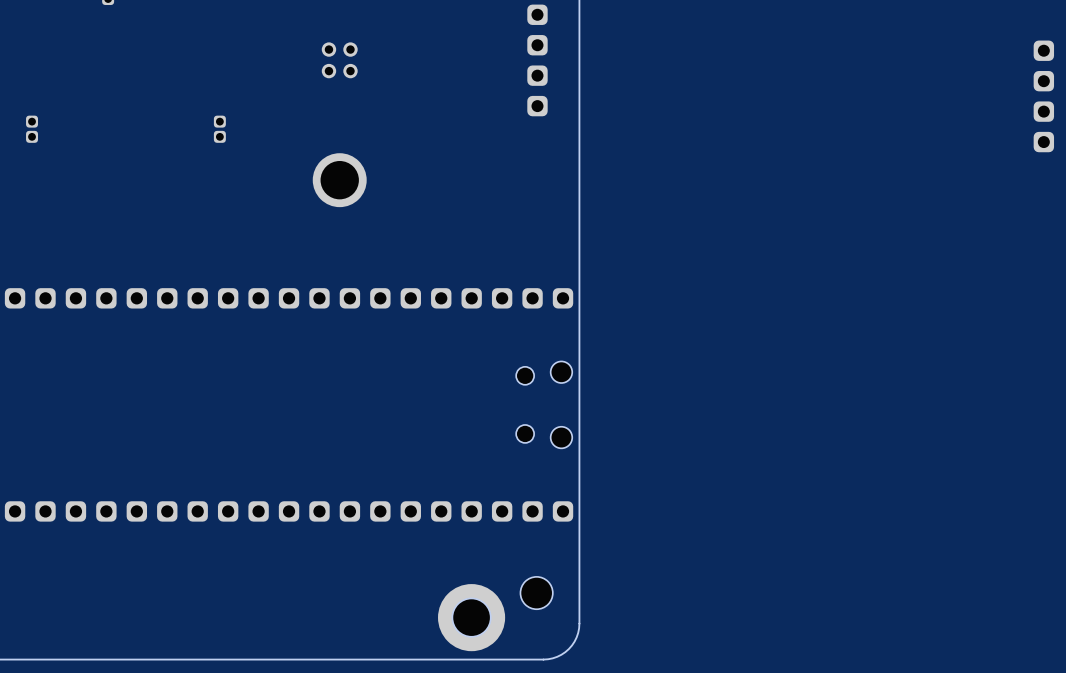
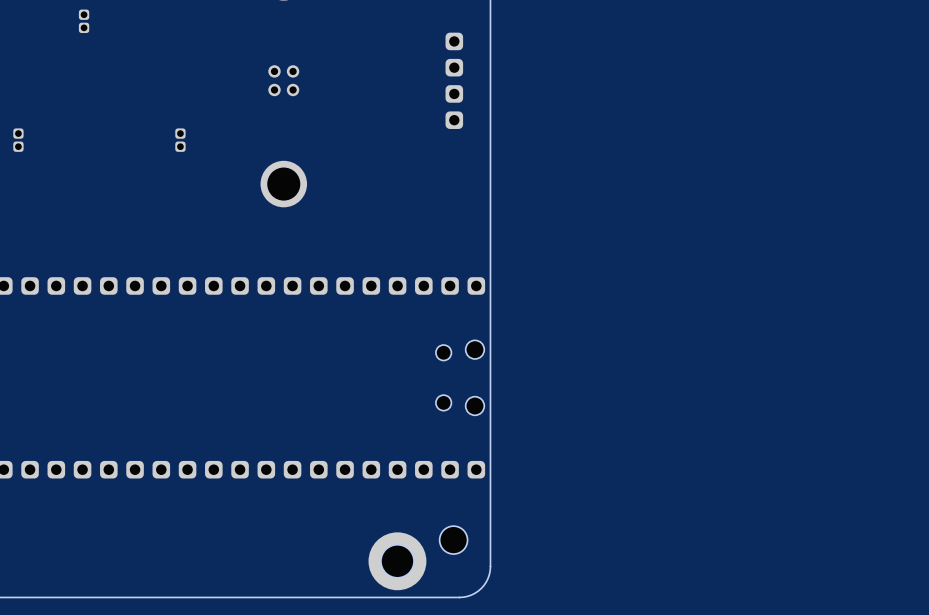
part: (1043, 96) -> none

